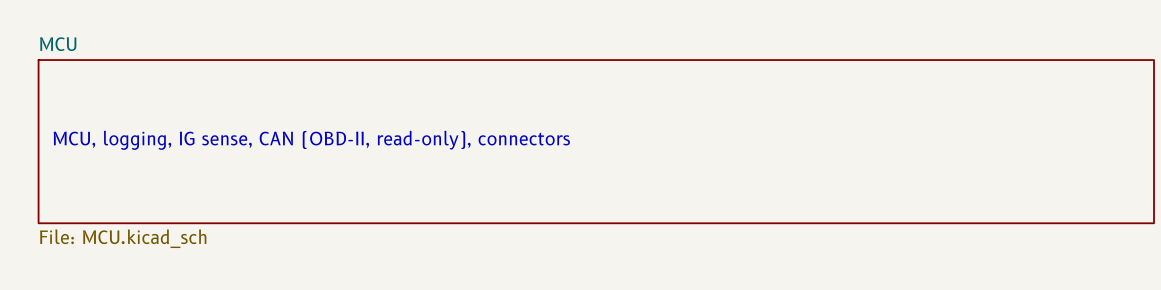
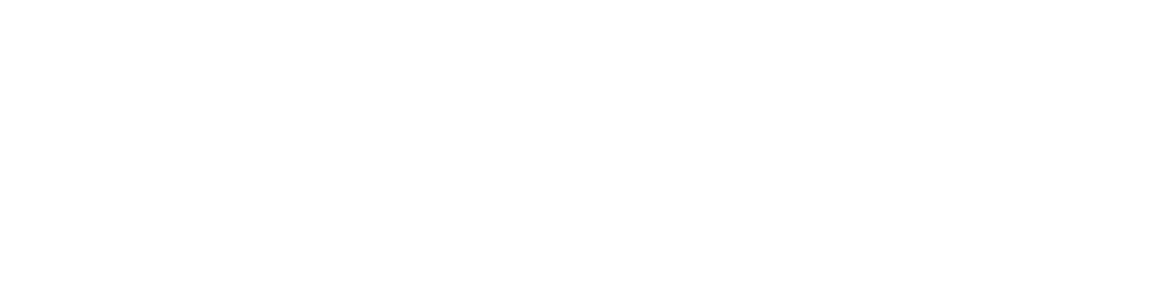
text: MCU, logging, IG sense, CAN (OBD-II, read-only), connectors (311, 140) -> none
sheet MCU: File: MCU.kicad_sch (596, 141) -> none

